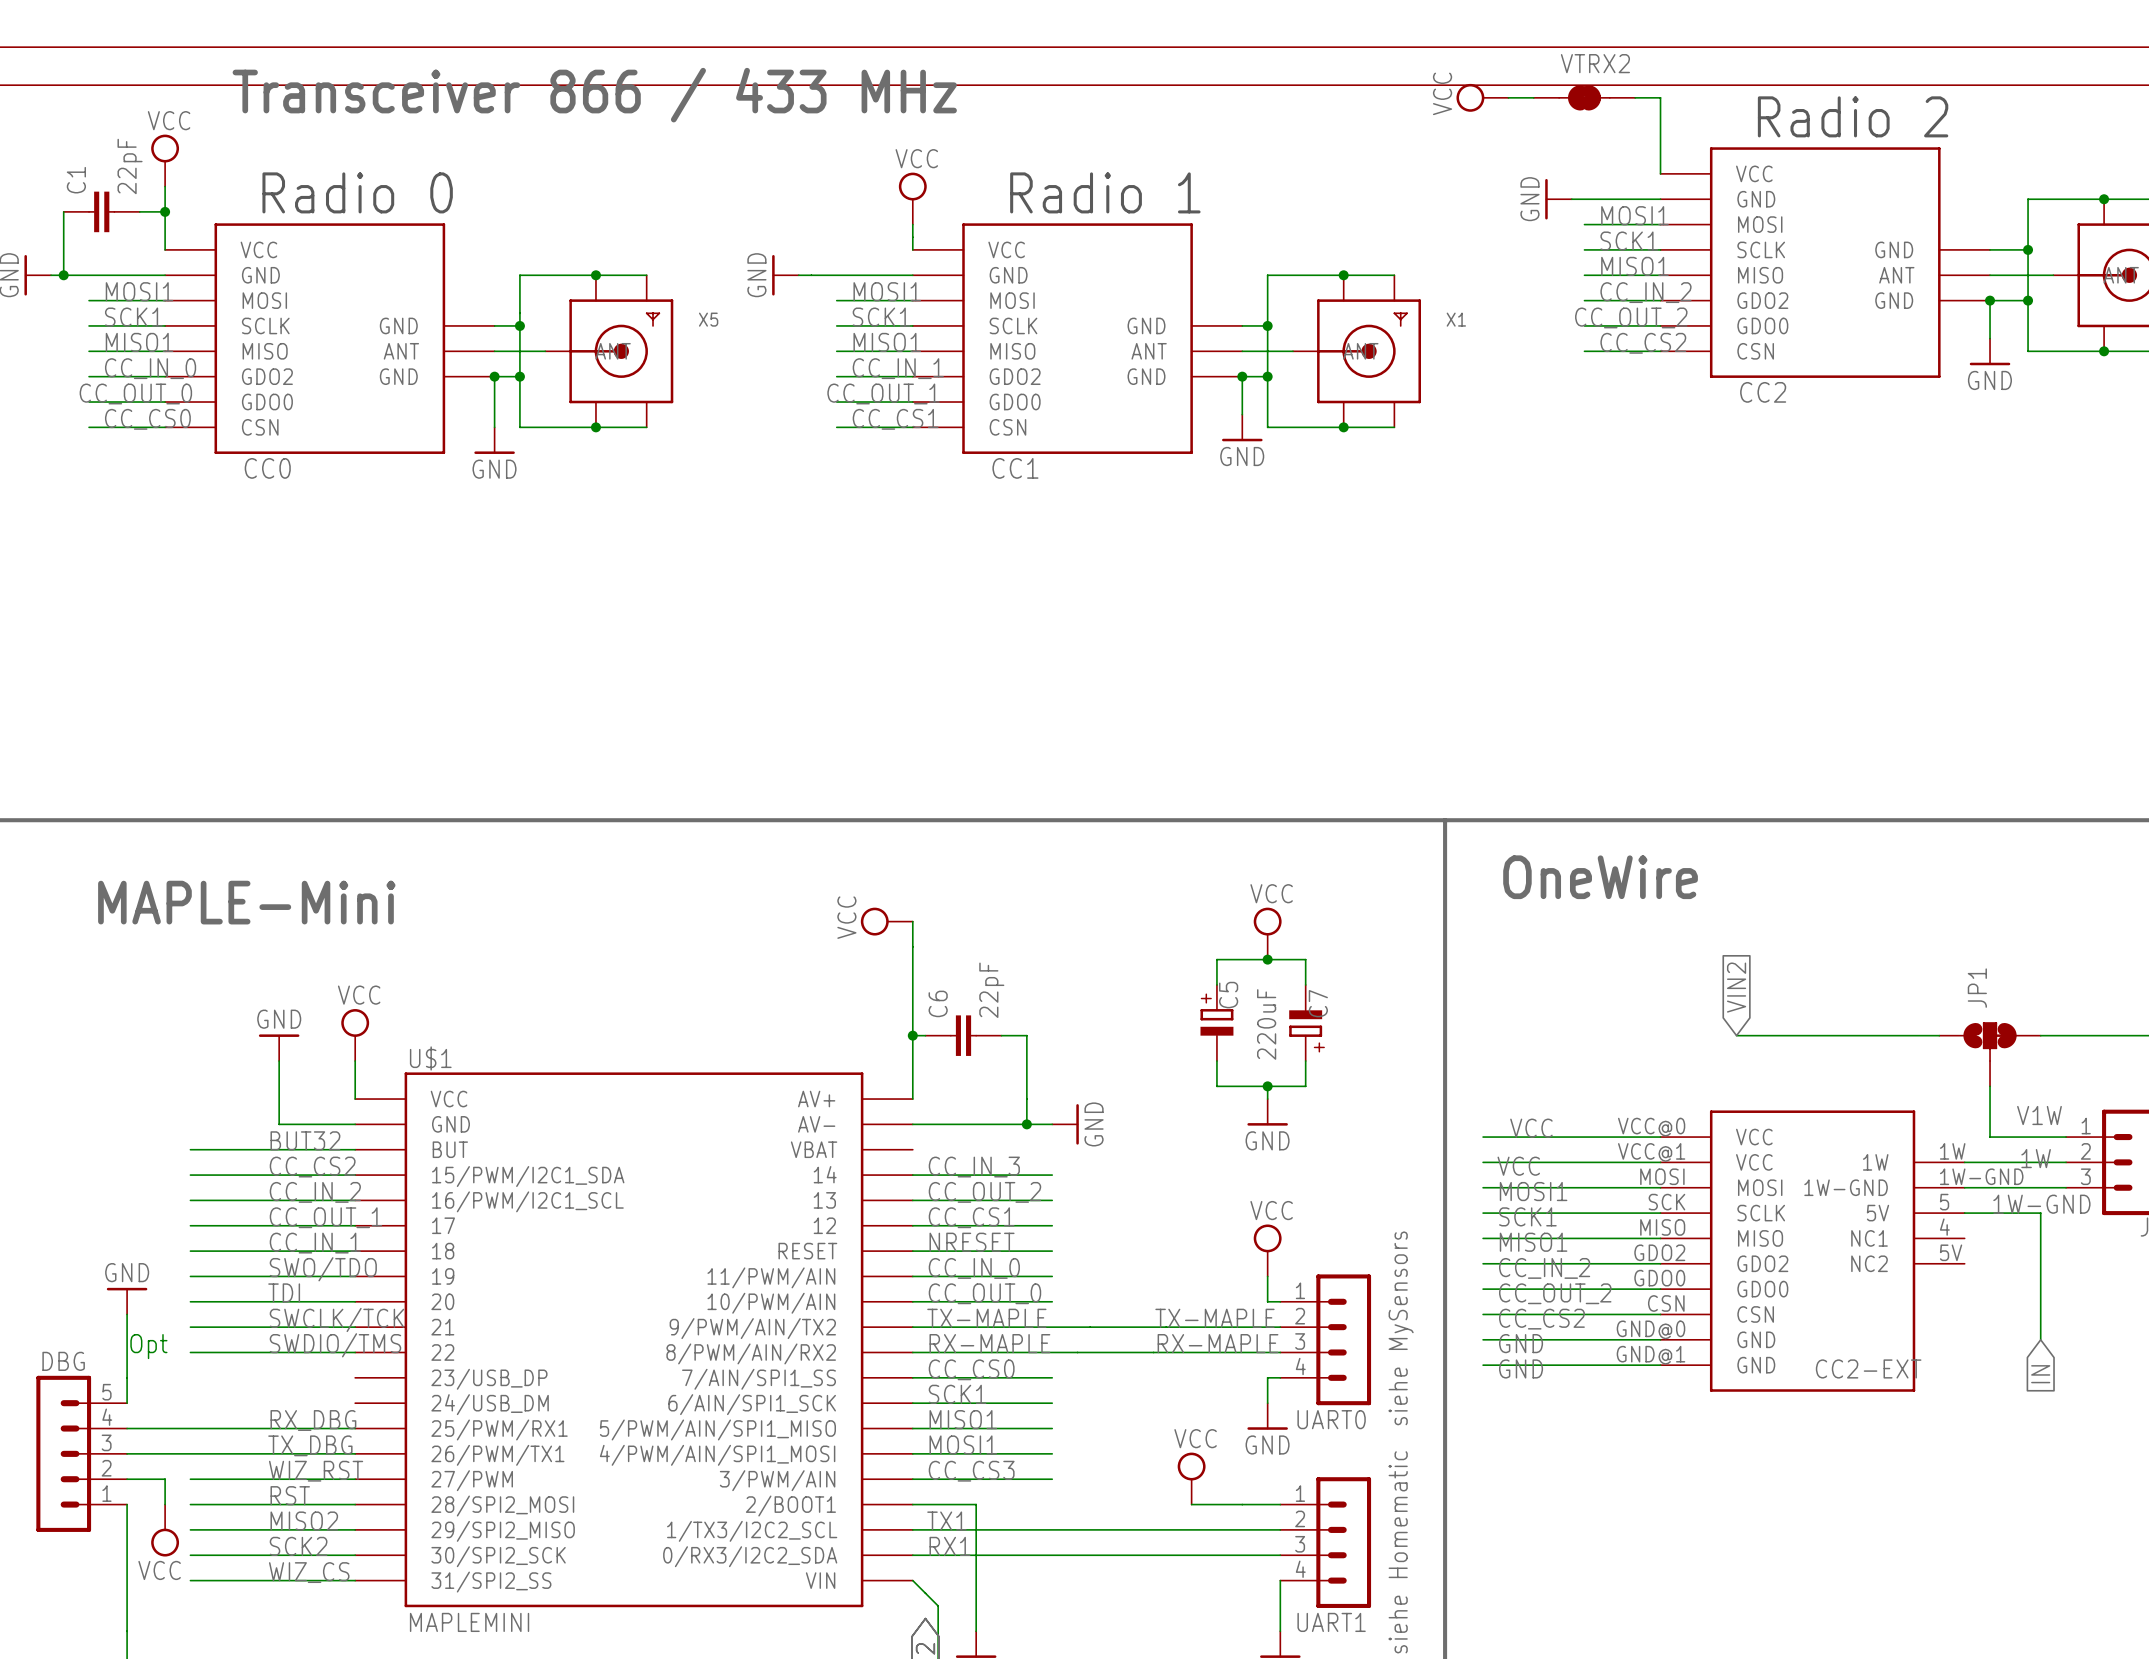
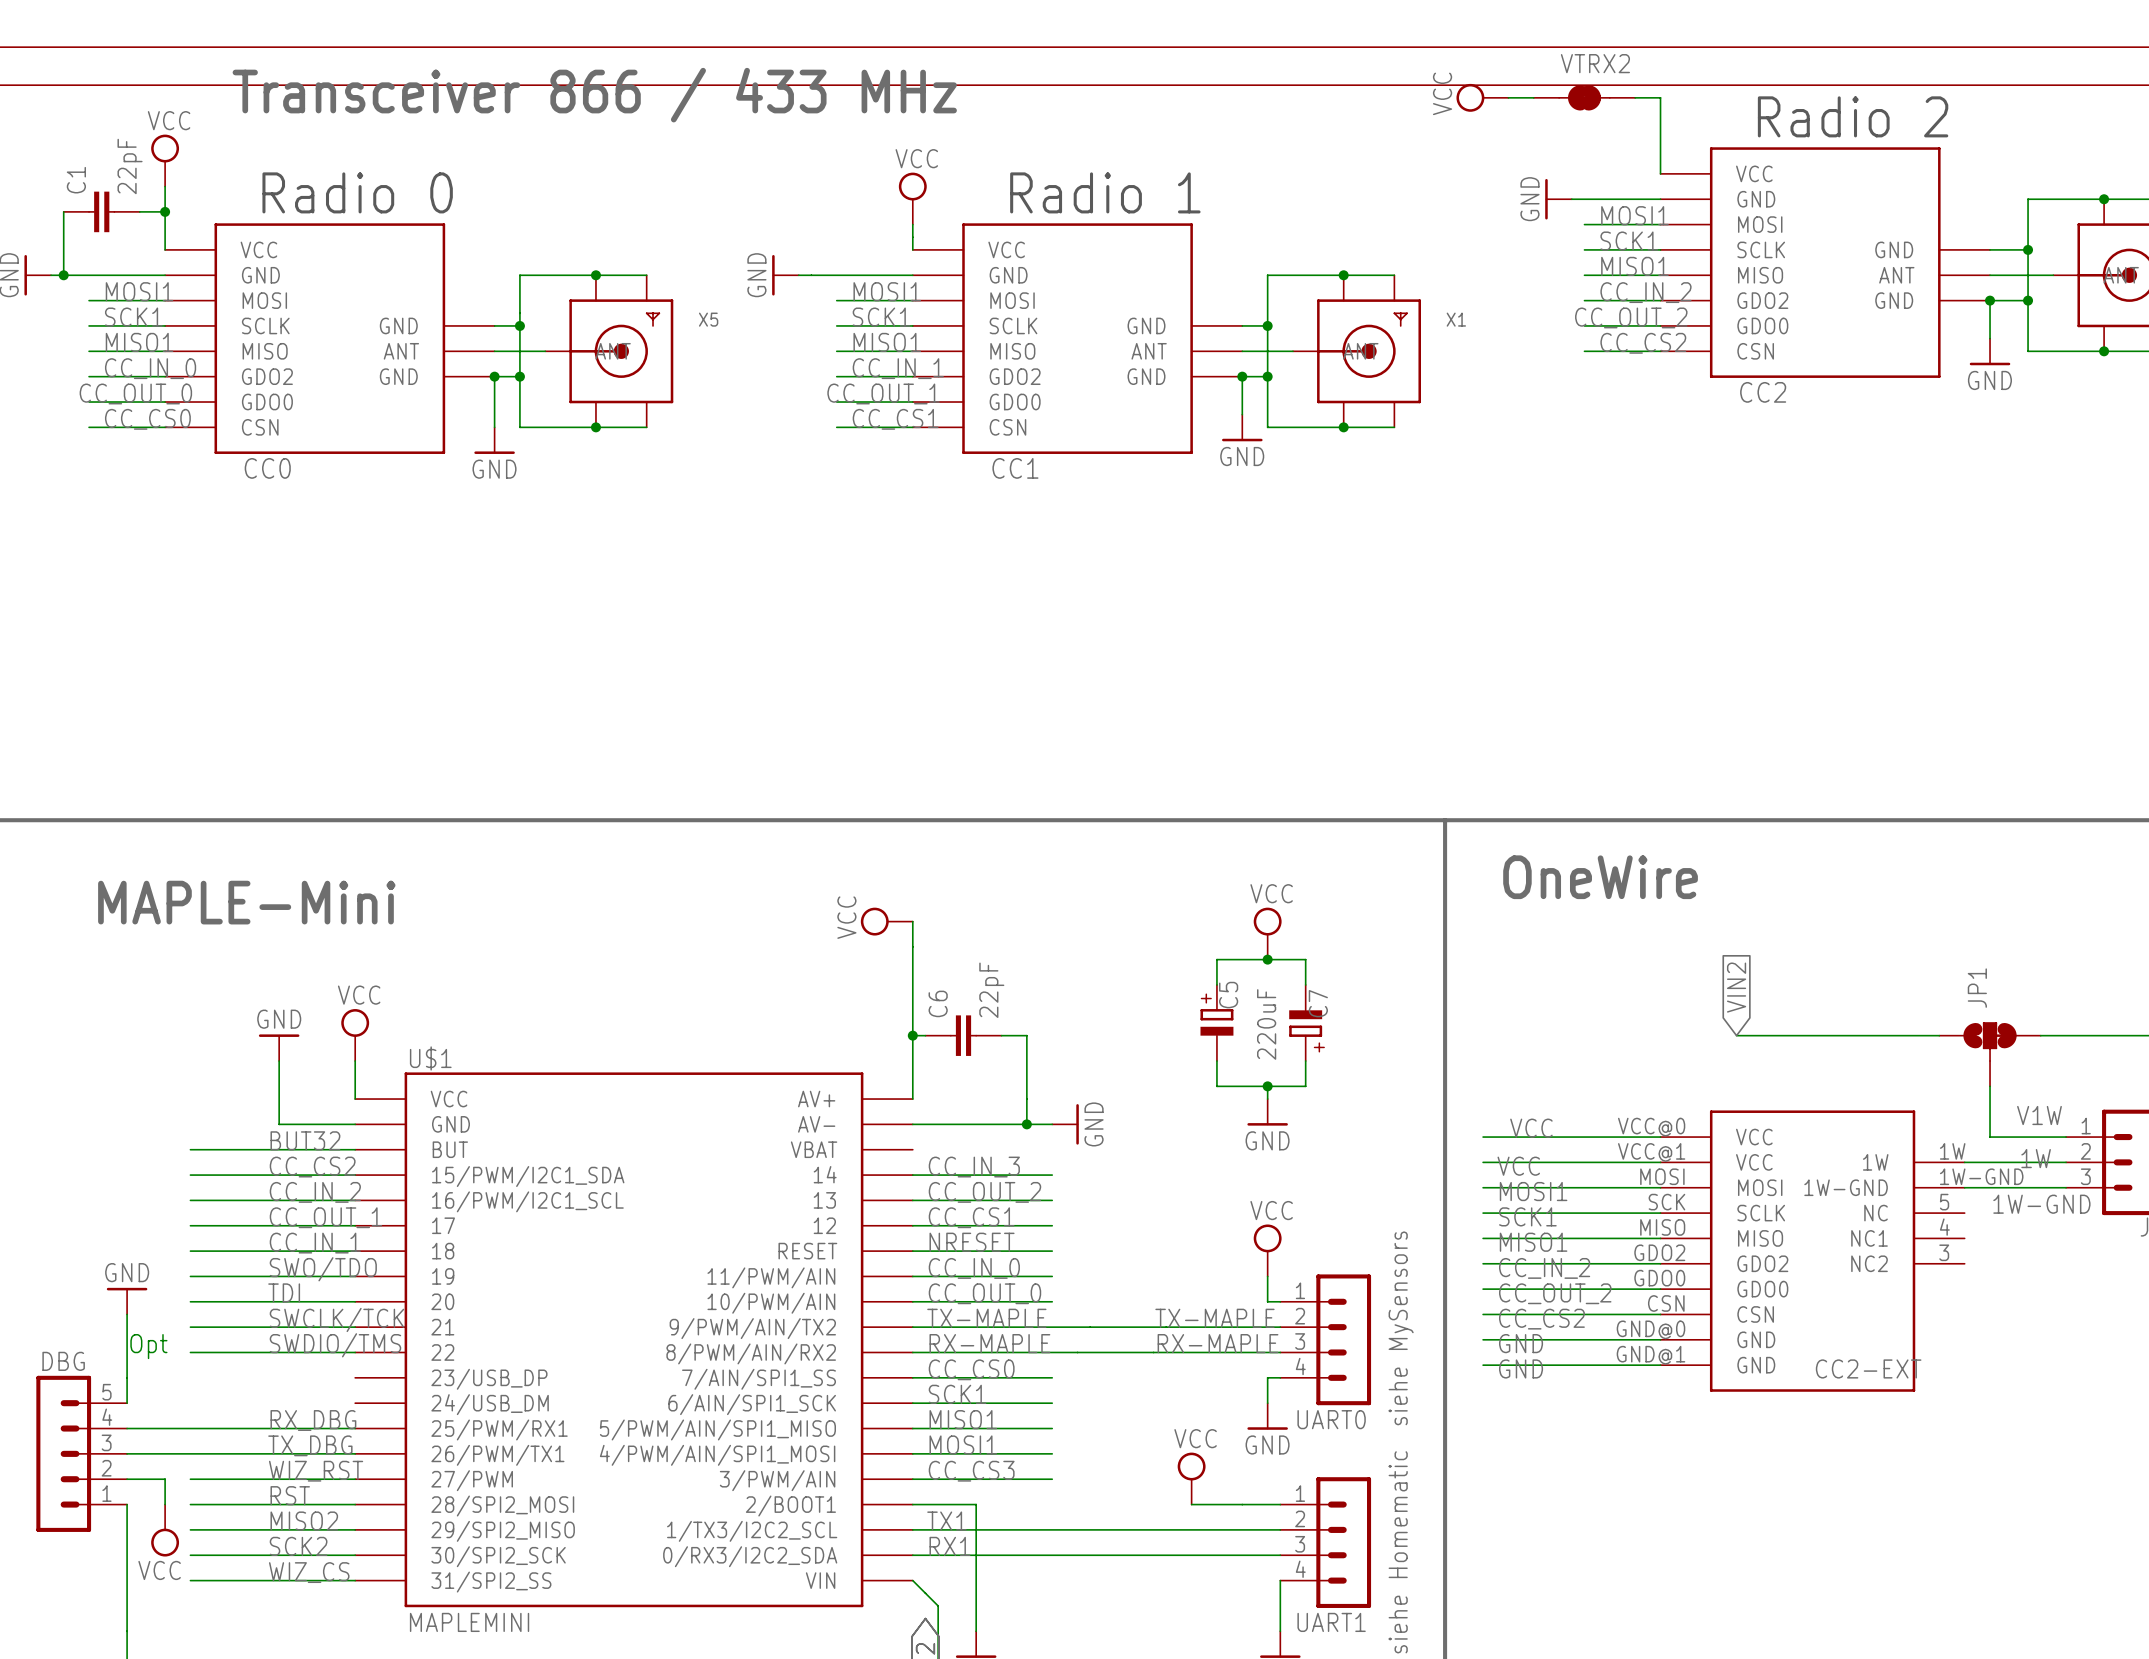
CC2-EXT pin name: 5V (1877, 1213) -> NC (1876, 1213)
wire: (1964, 1213) (2040, 1213) (2040, 1339) -> none
CC2-EXT pin number: 5V (1951, 1252) -> 3 (1944, 1252)
global label: IN (2040, 1374) -> none

